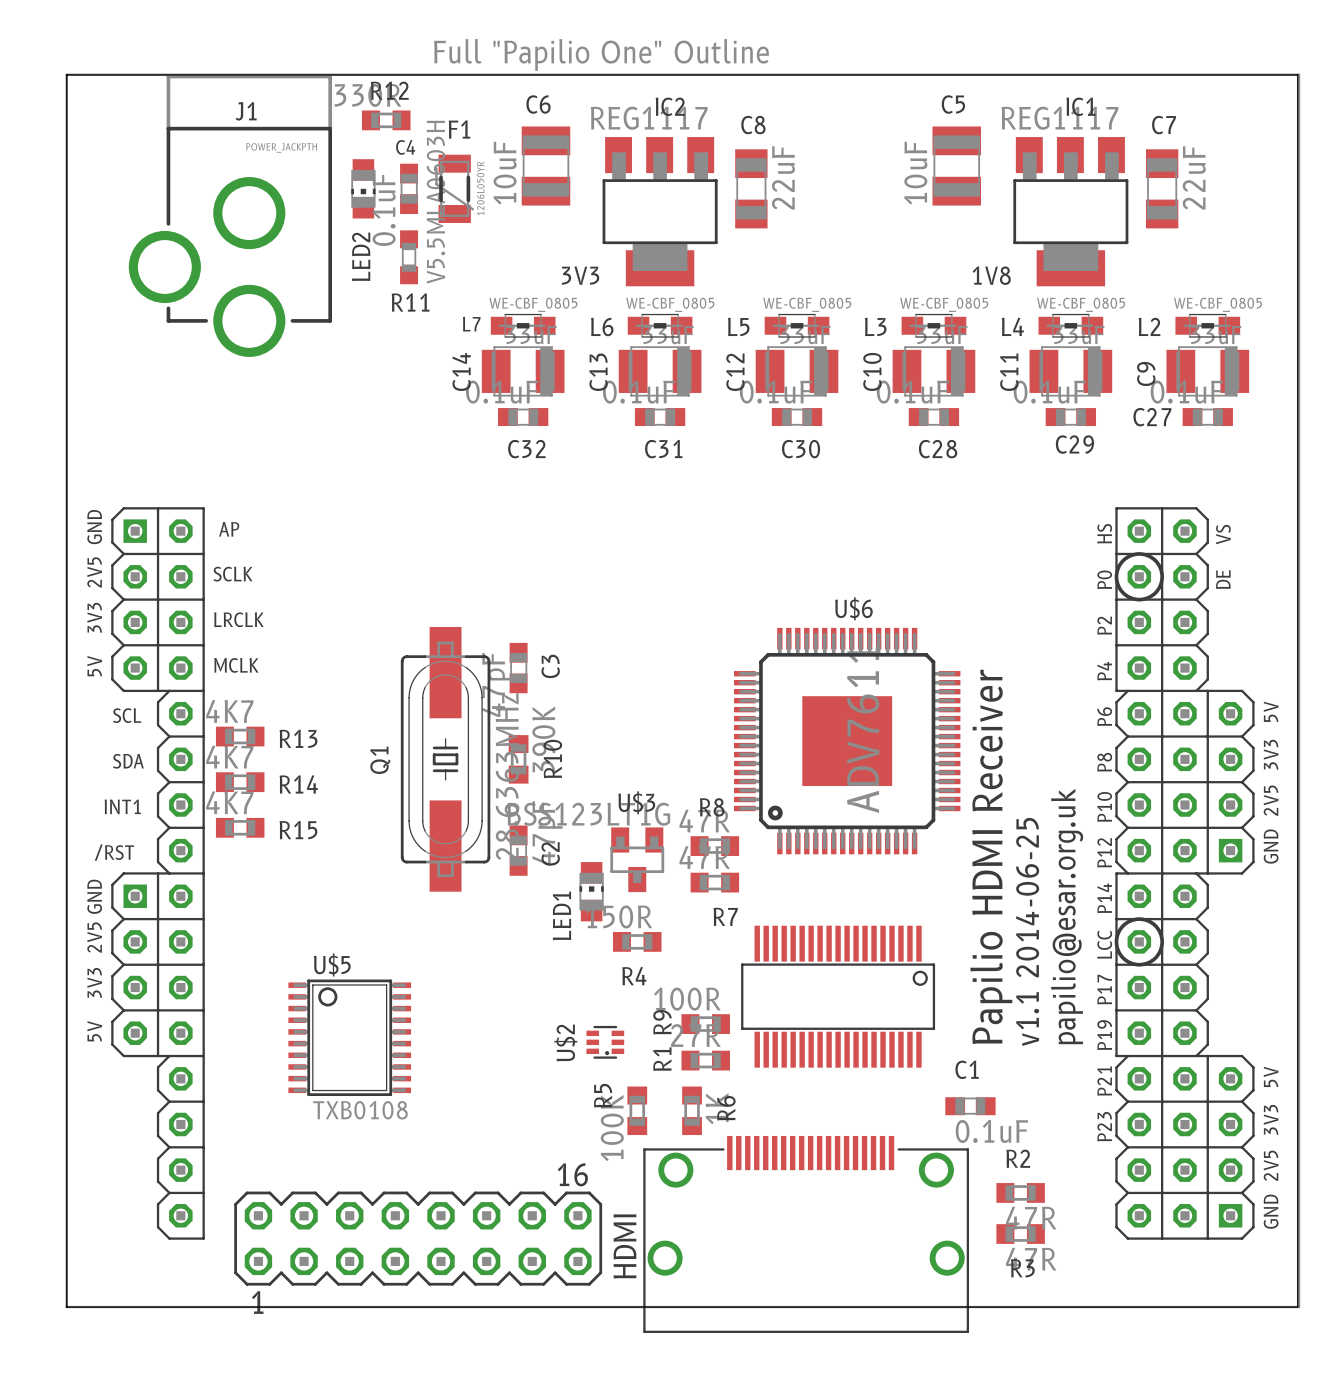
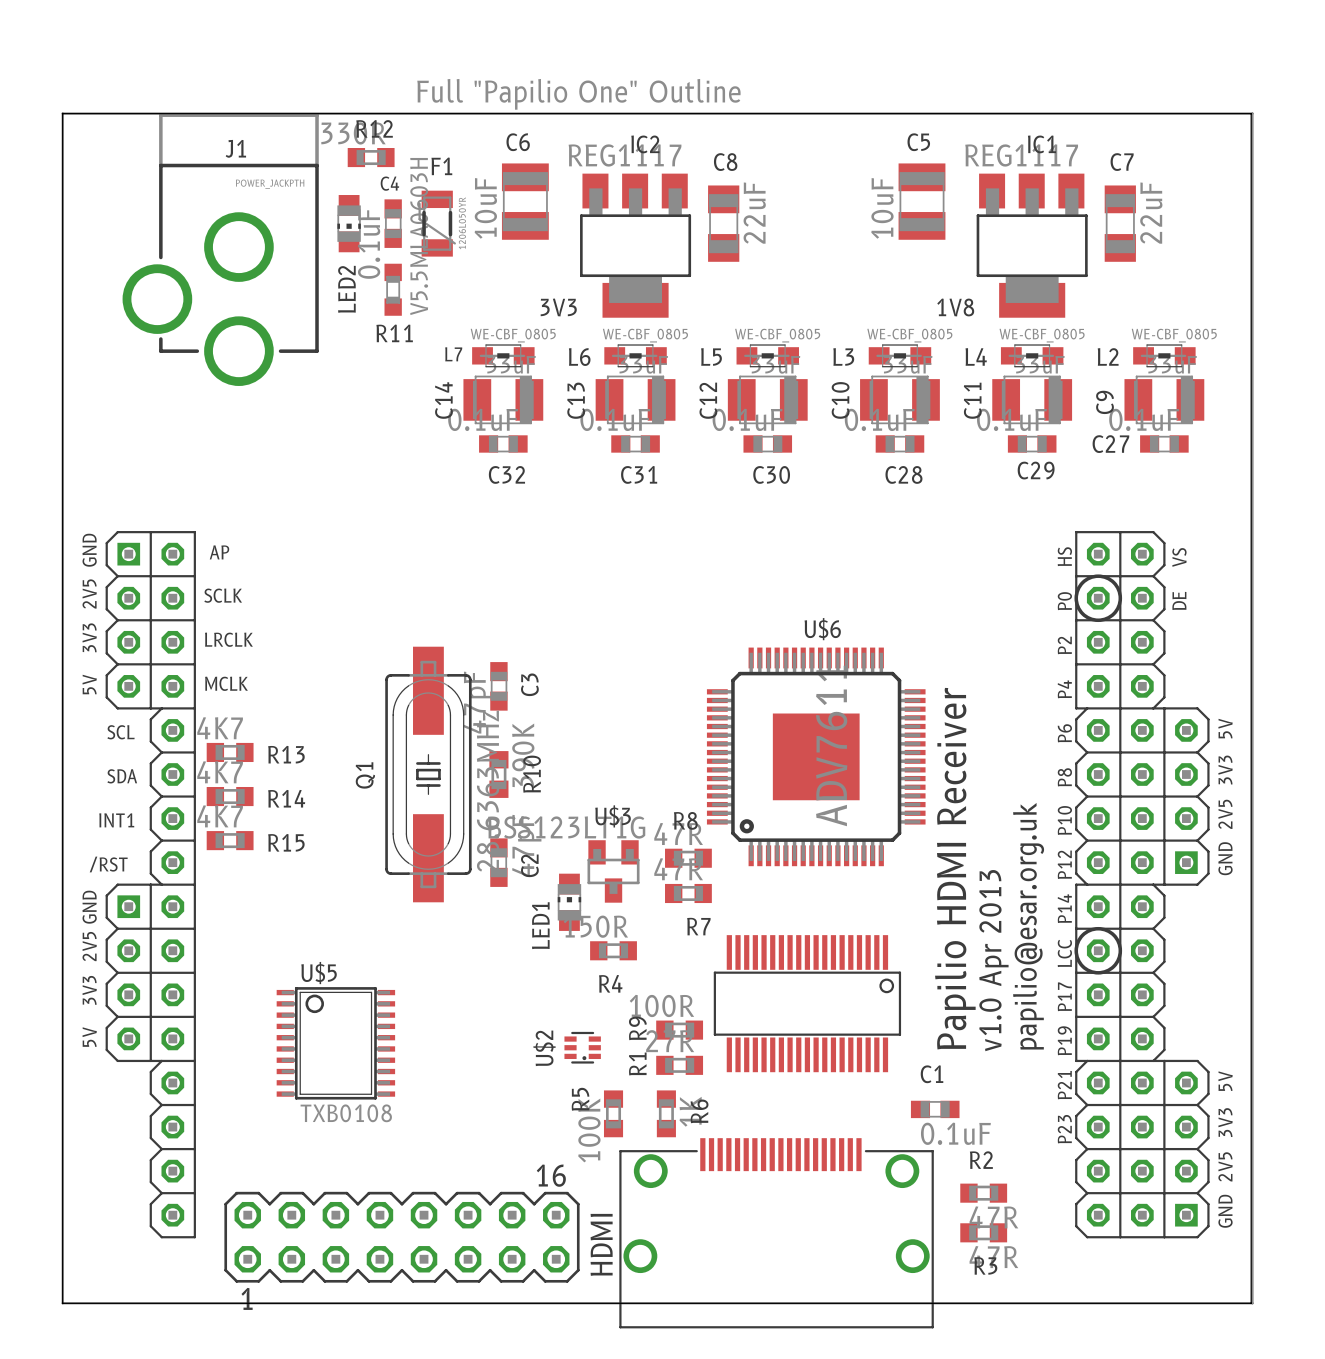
text: v1.1 2014-06-25 (1027, 931) -> v1.0 Apr 2013 (993, 960)

